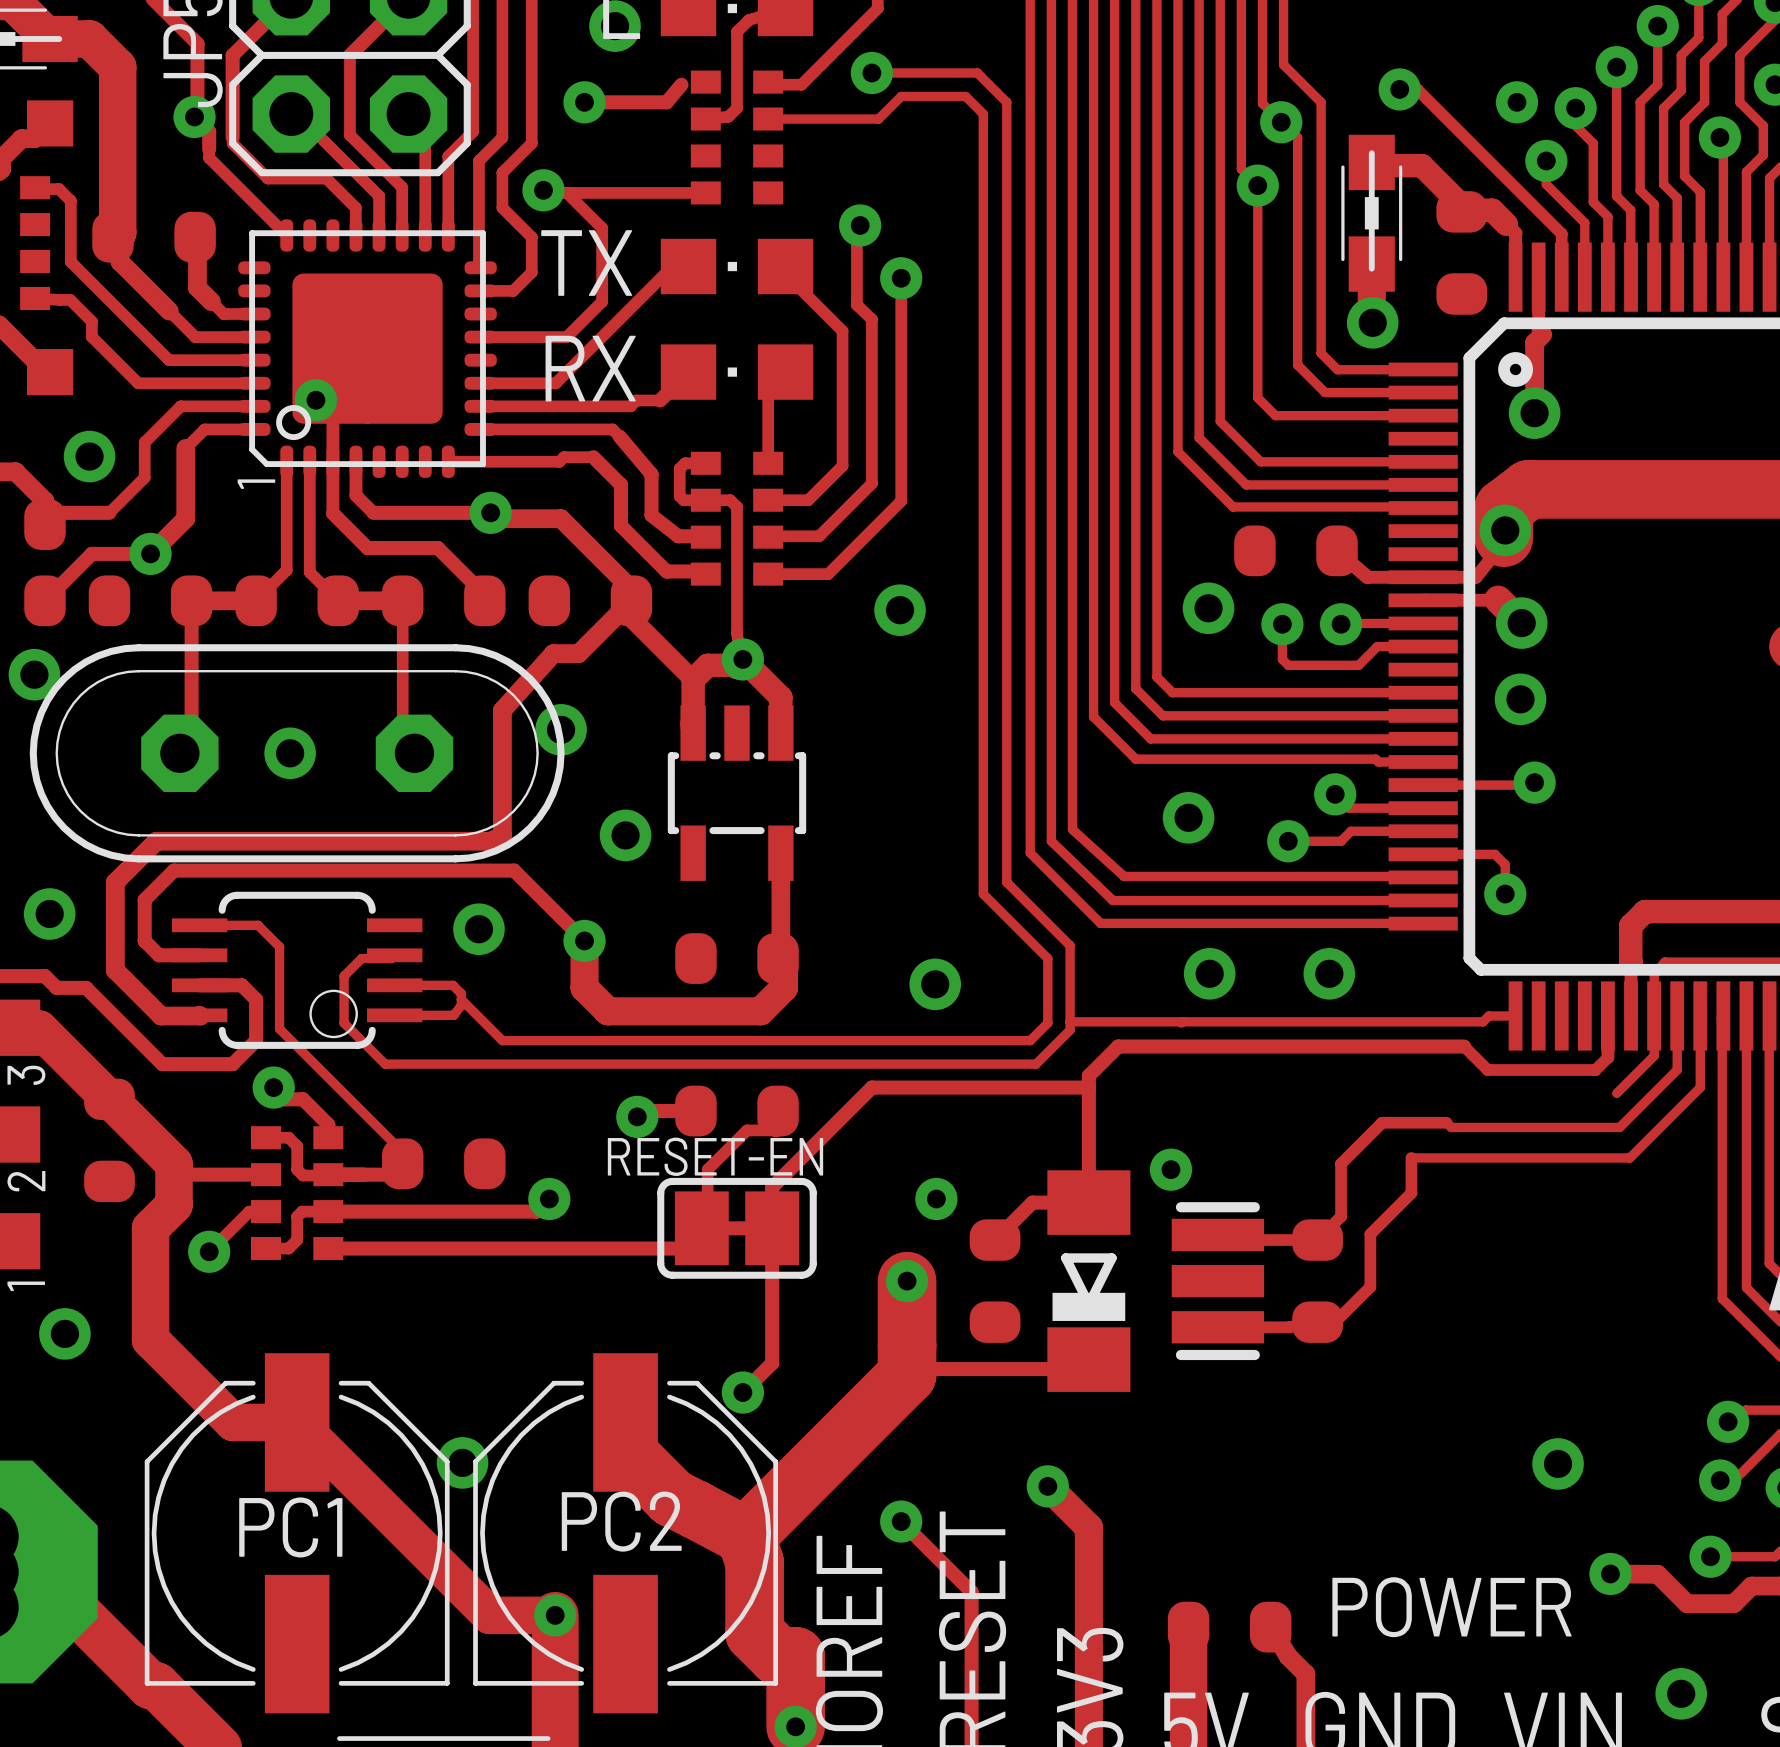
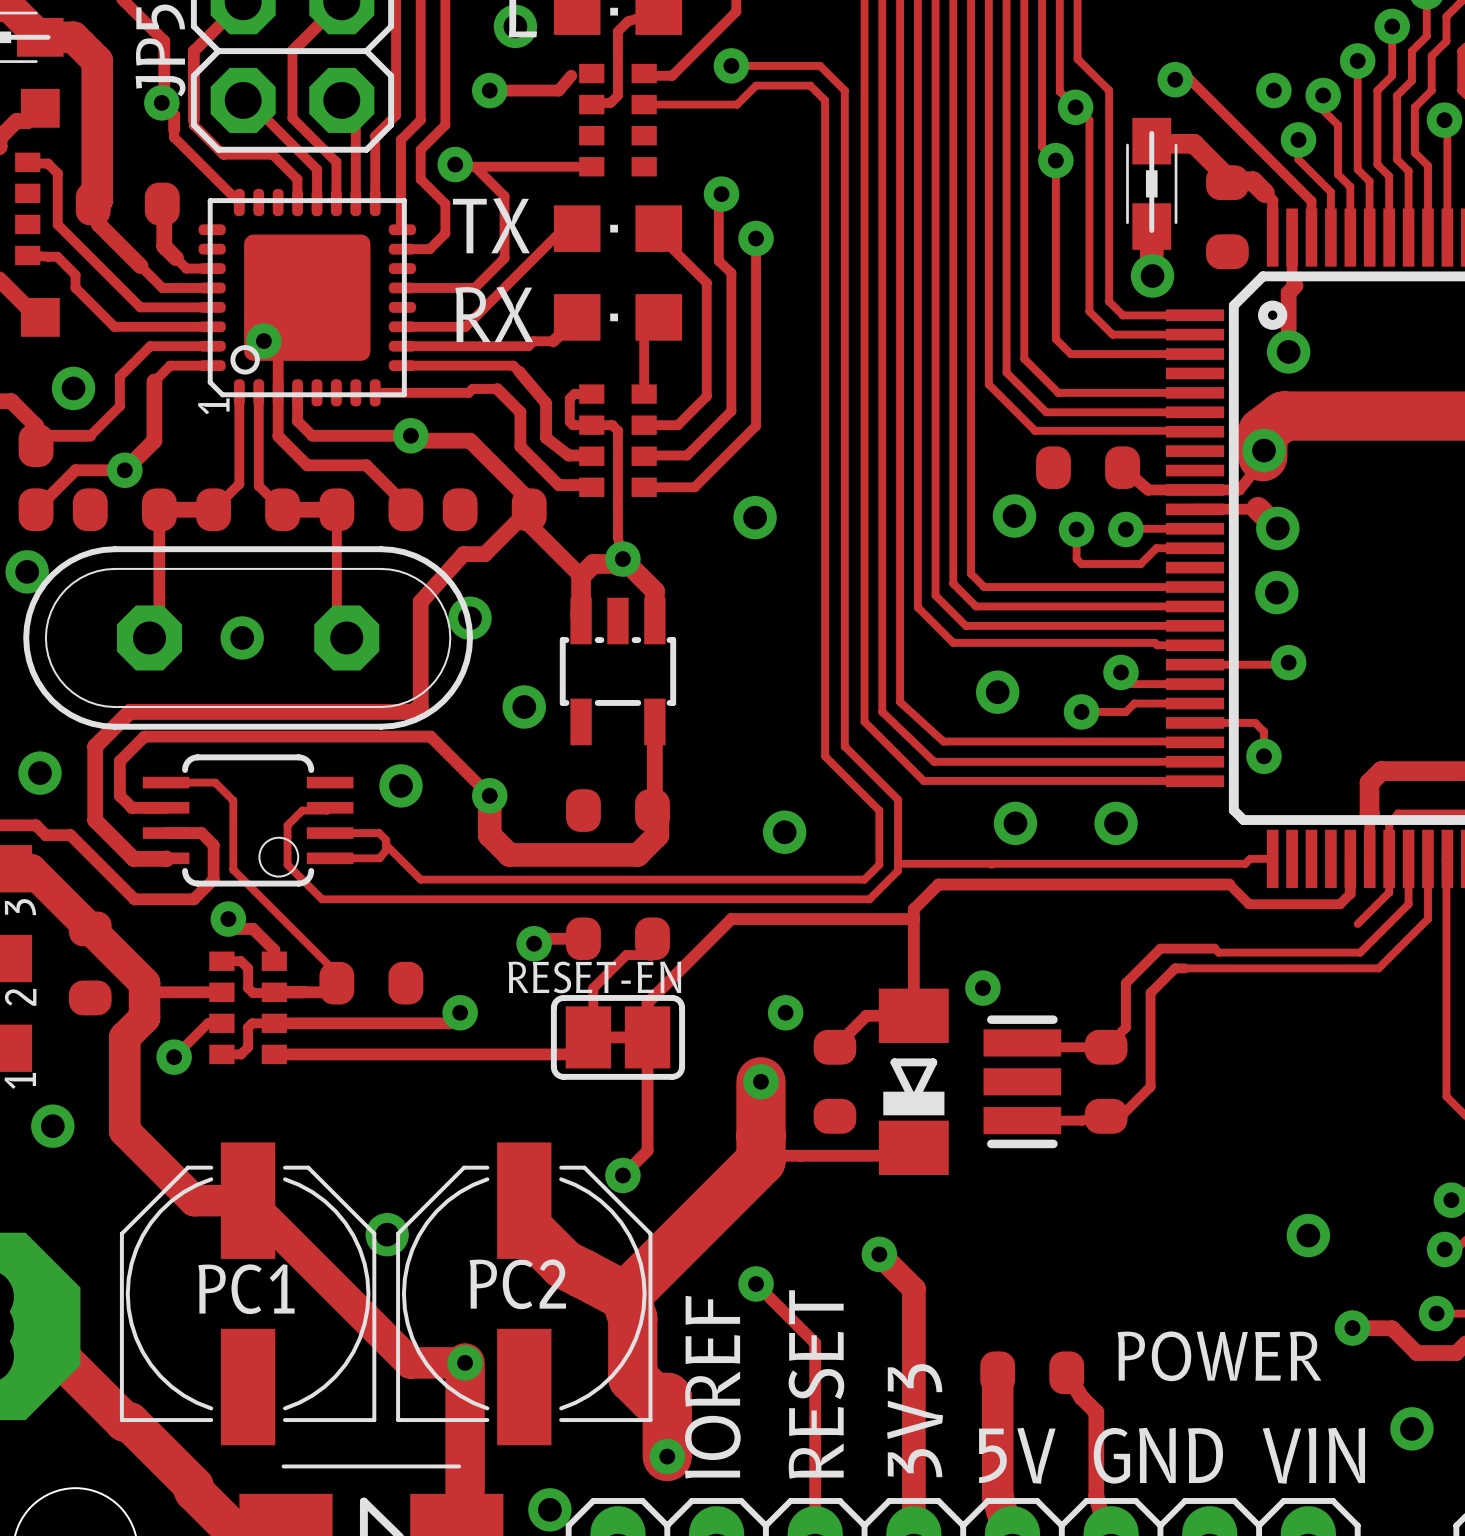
track: (1641, 1146) (1629, 1157) (1411, 1157) (1411, 1193) (1370, 1234) -> (1378, 968) (1175, 968) (1150, 993) (1150, 1042)

